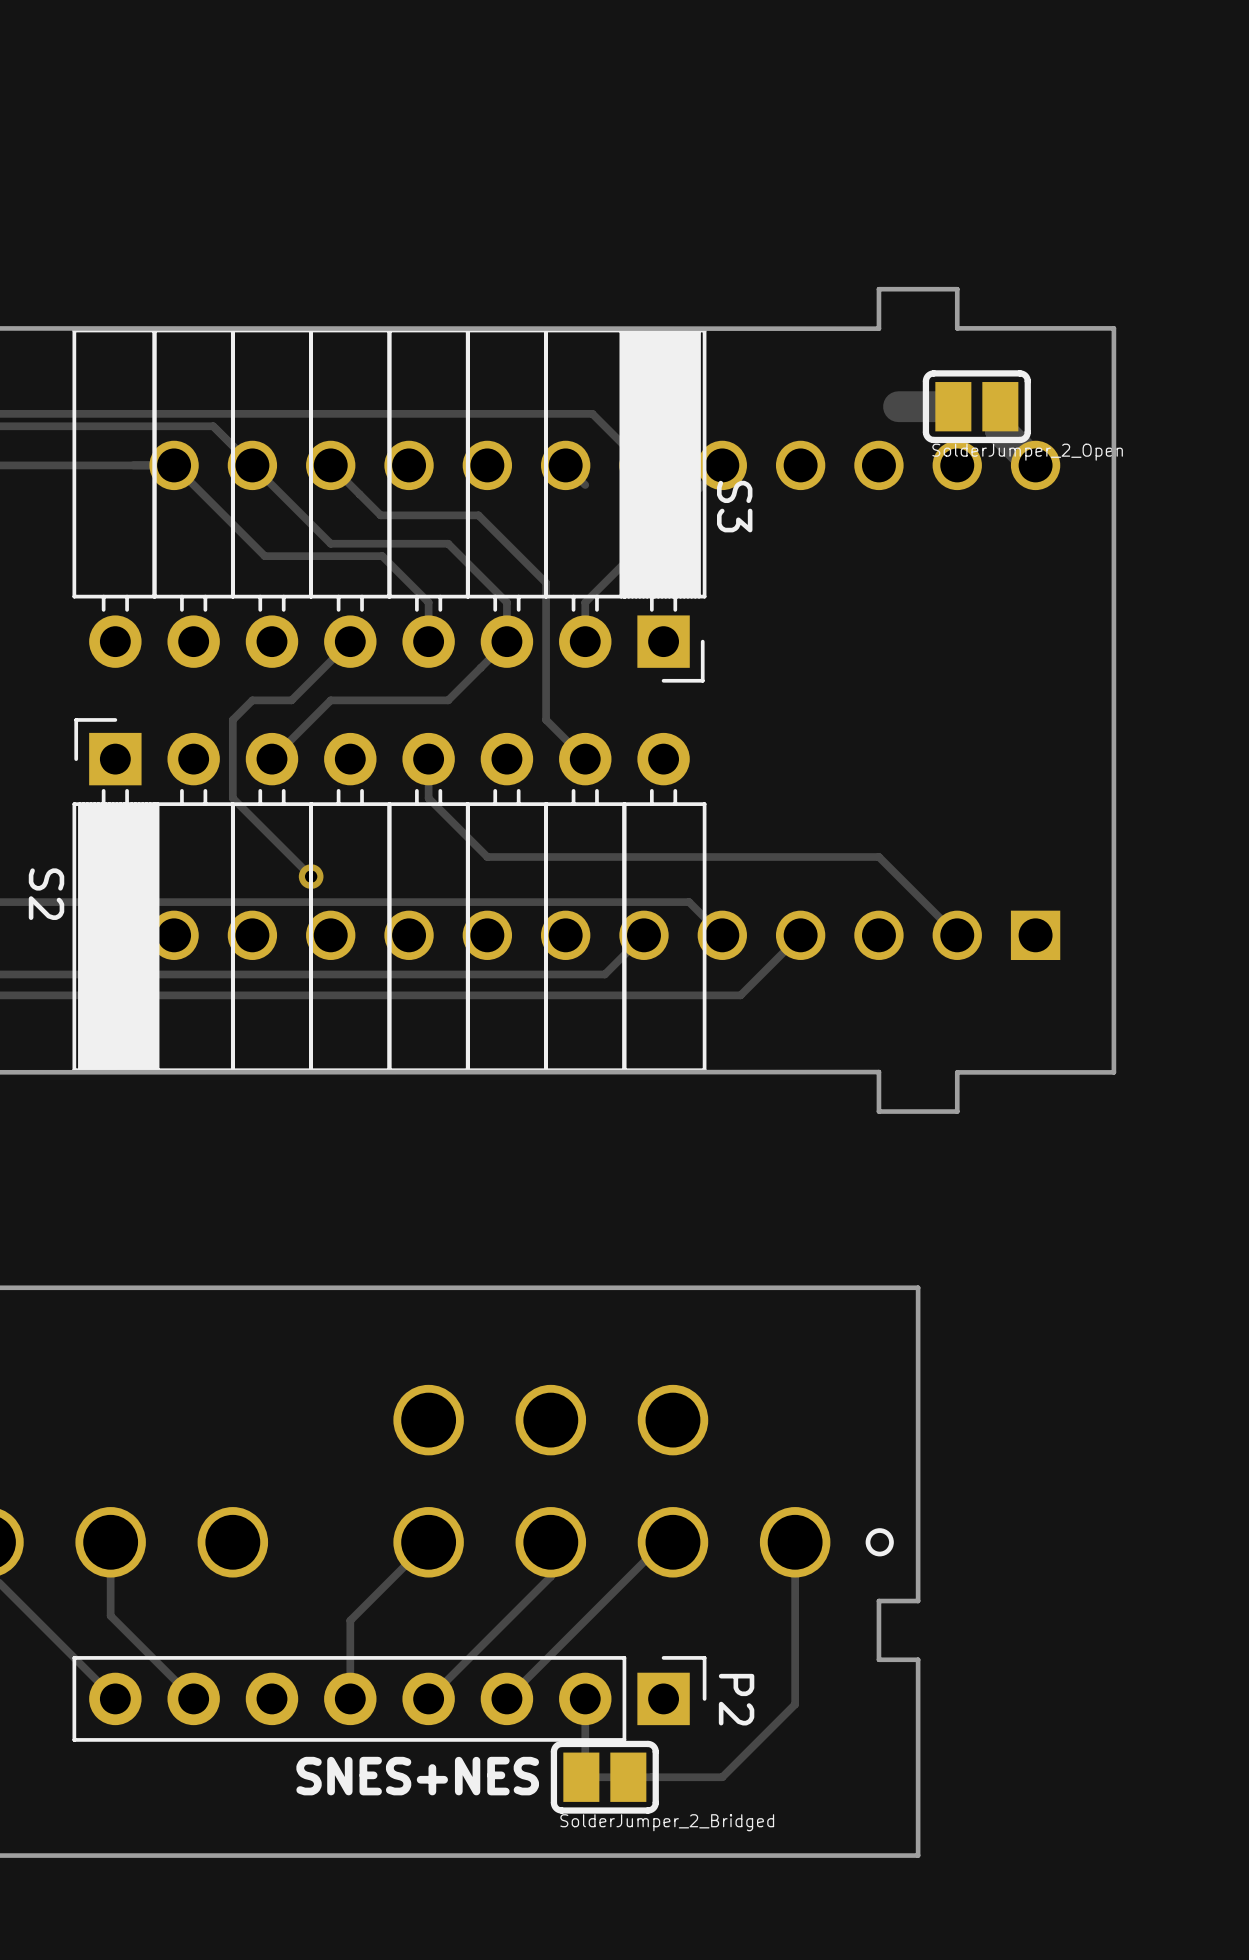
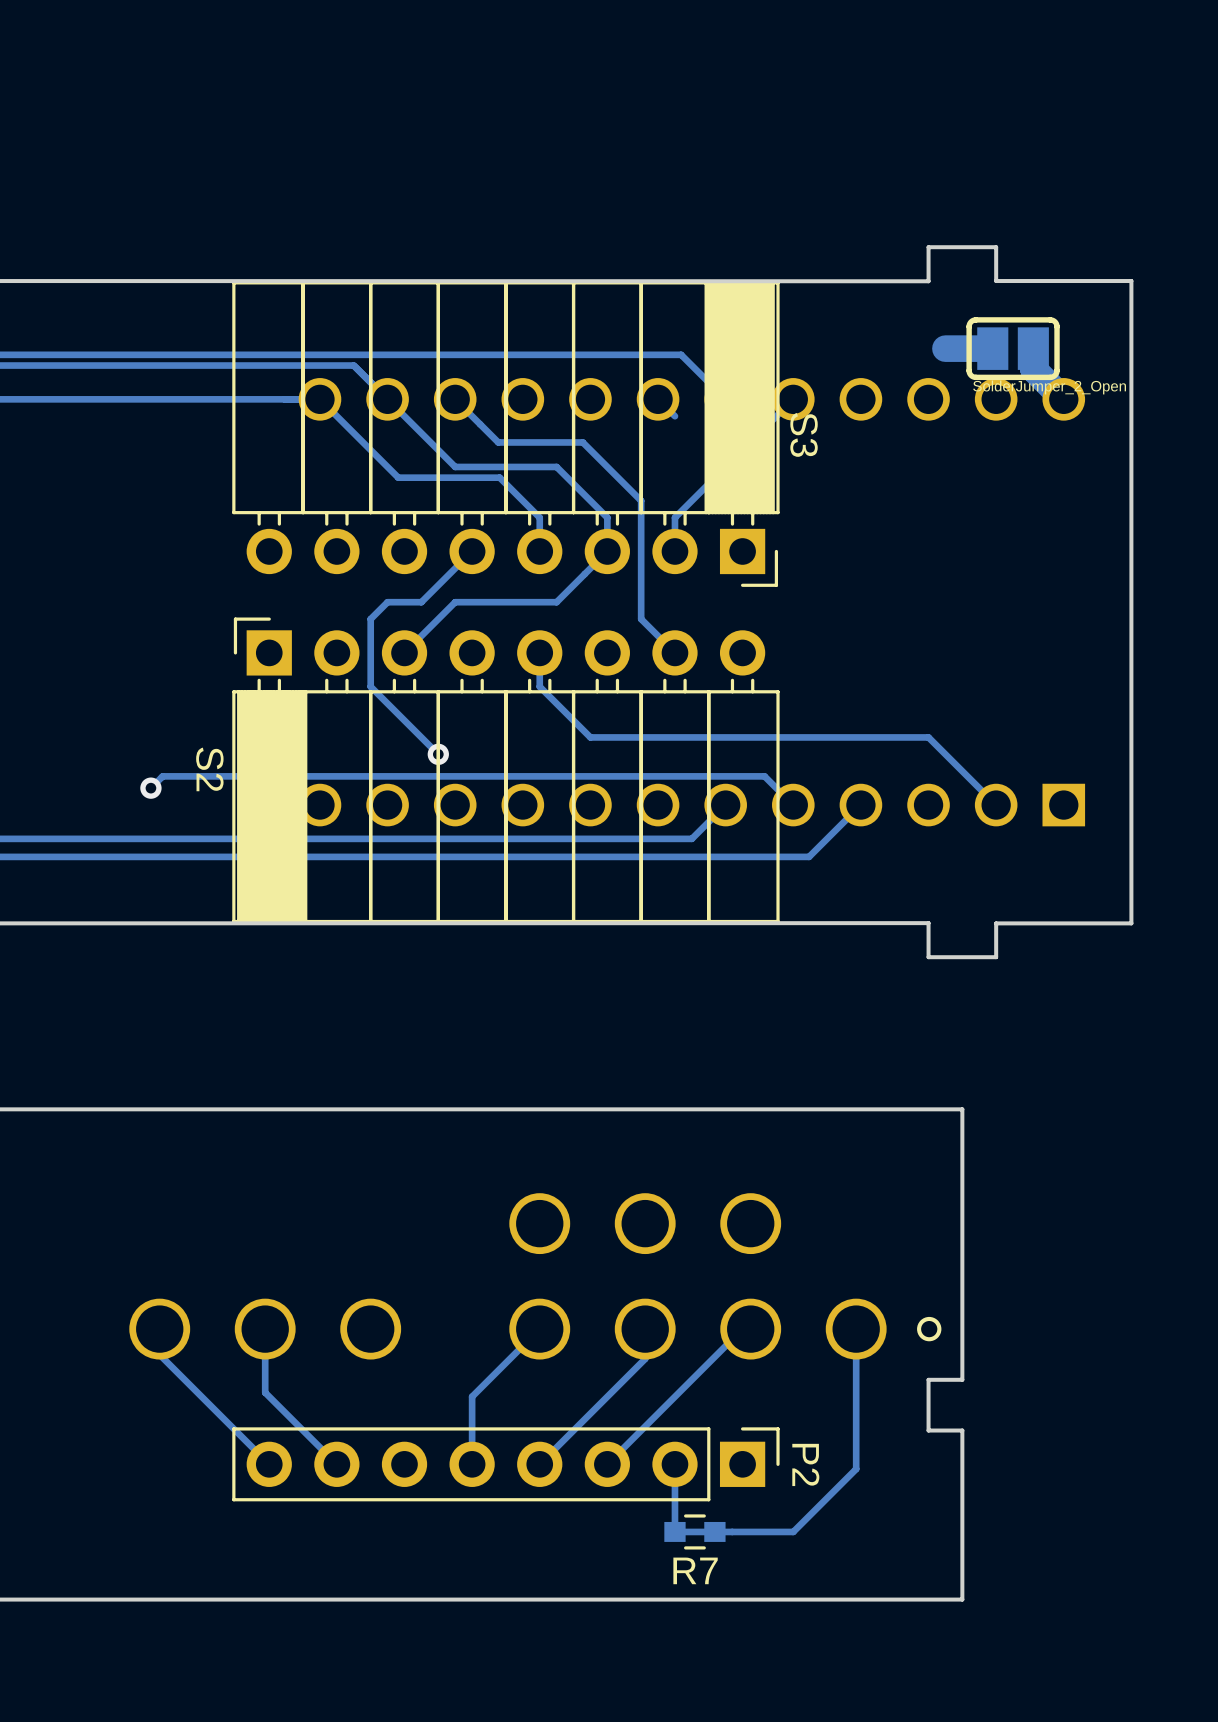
text: SNES+NES (417, 1776) -> none
part: SolderJumper_2_Bridged (604, 1777) -> none
R7: none -> (694, 1531)

